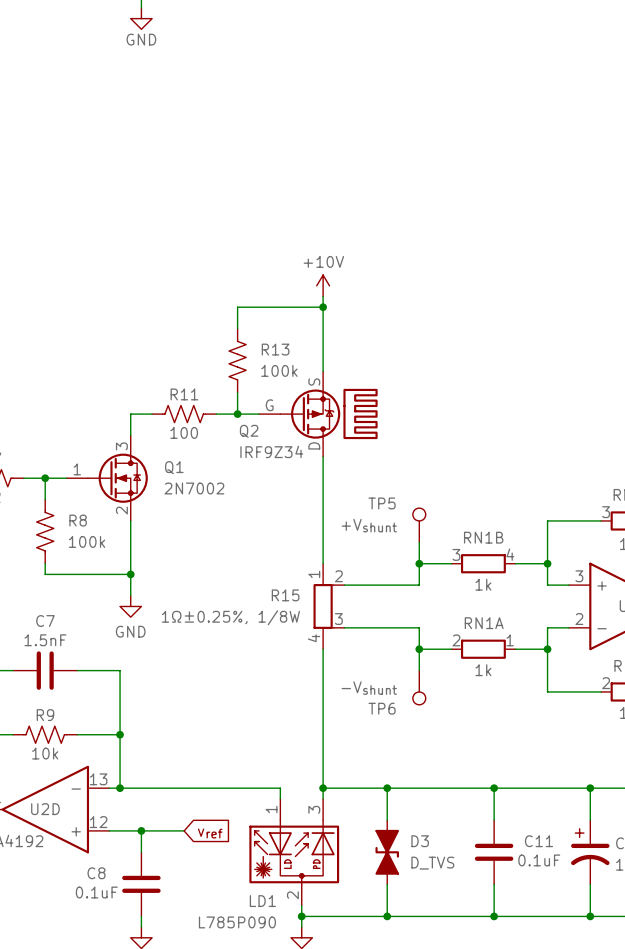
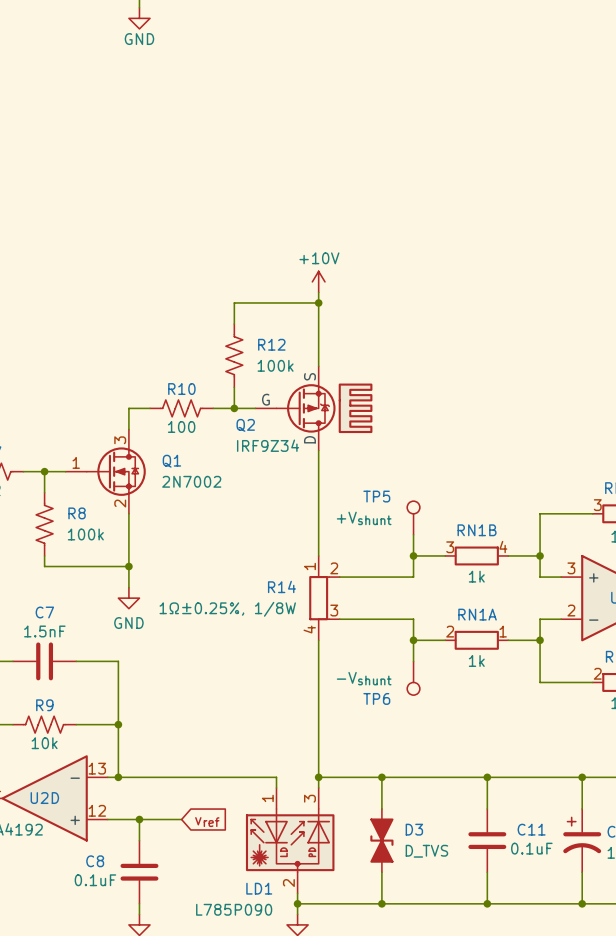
R13 name: R13 (275, 349) -> R12 (271, 344)
R11 name: R11 (184, 394) -> R10 (181, 389)
R15 name: R15 (285, 595) -> R14 (281, 586)

